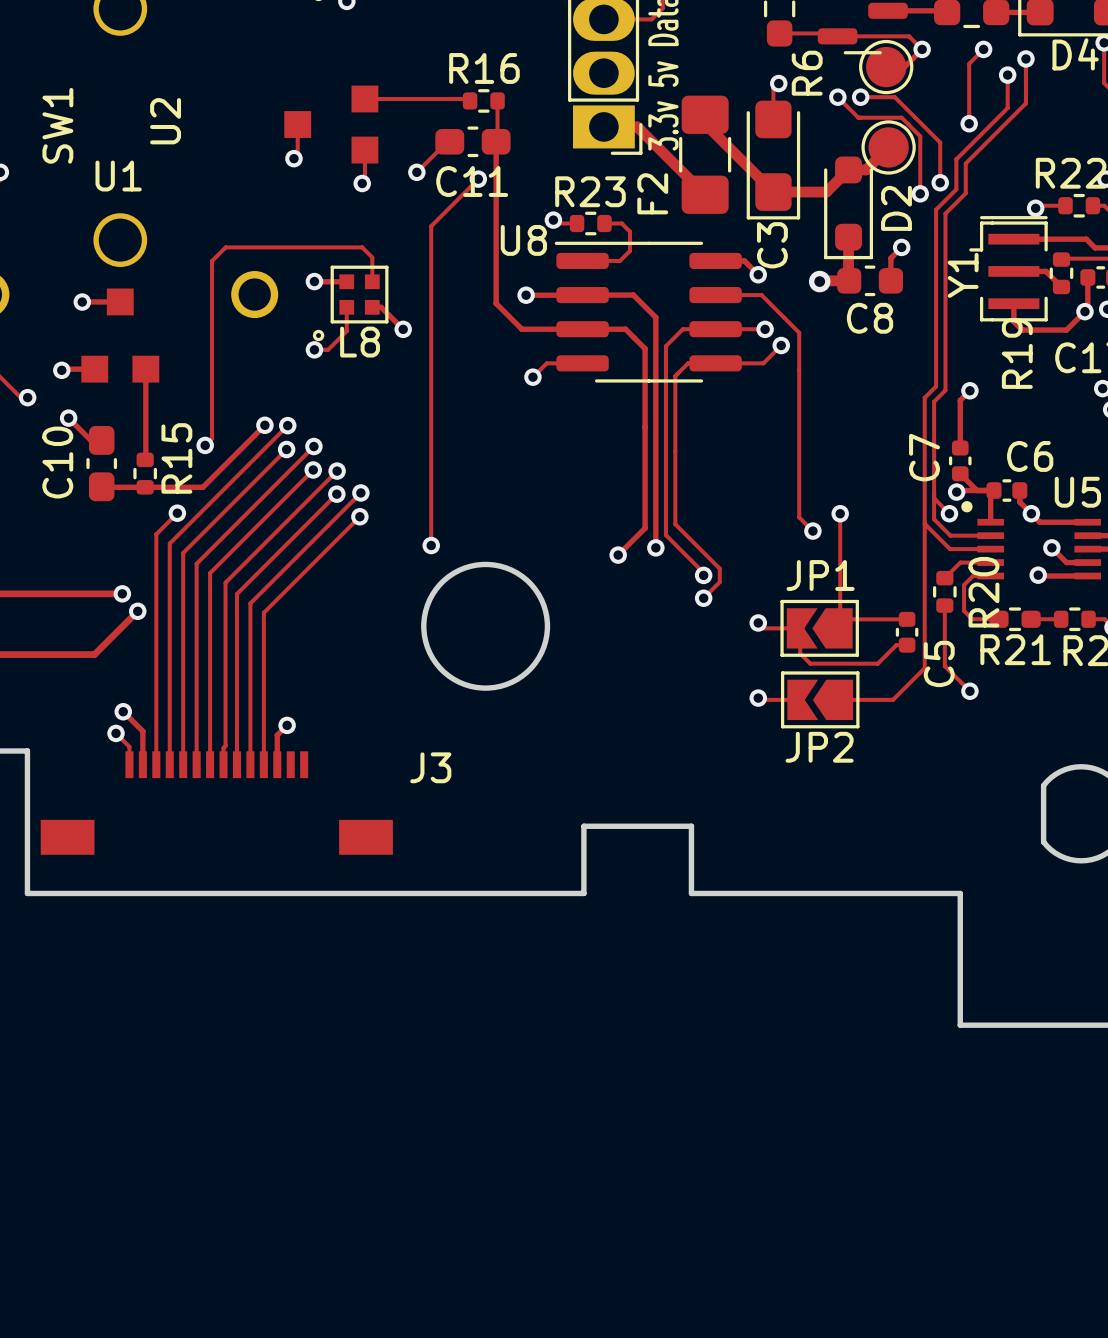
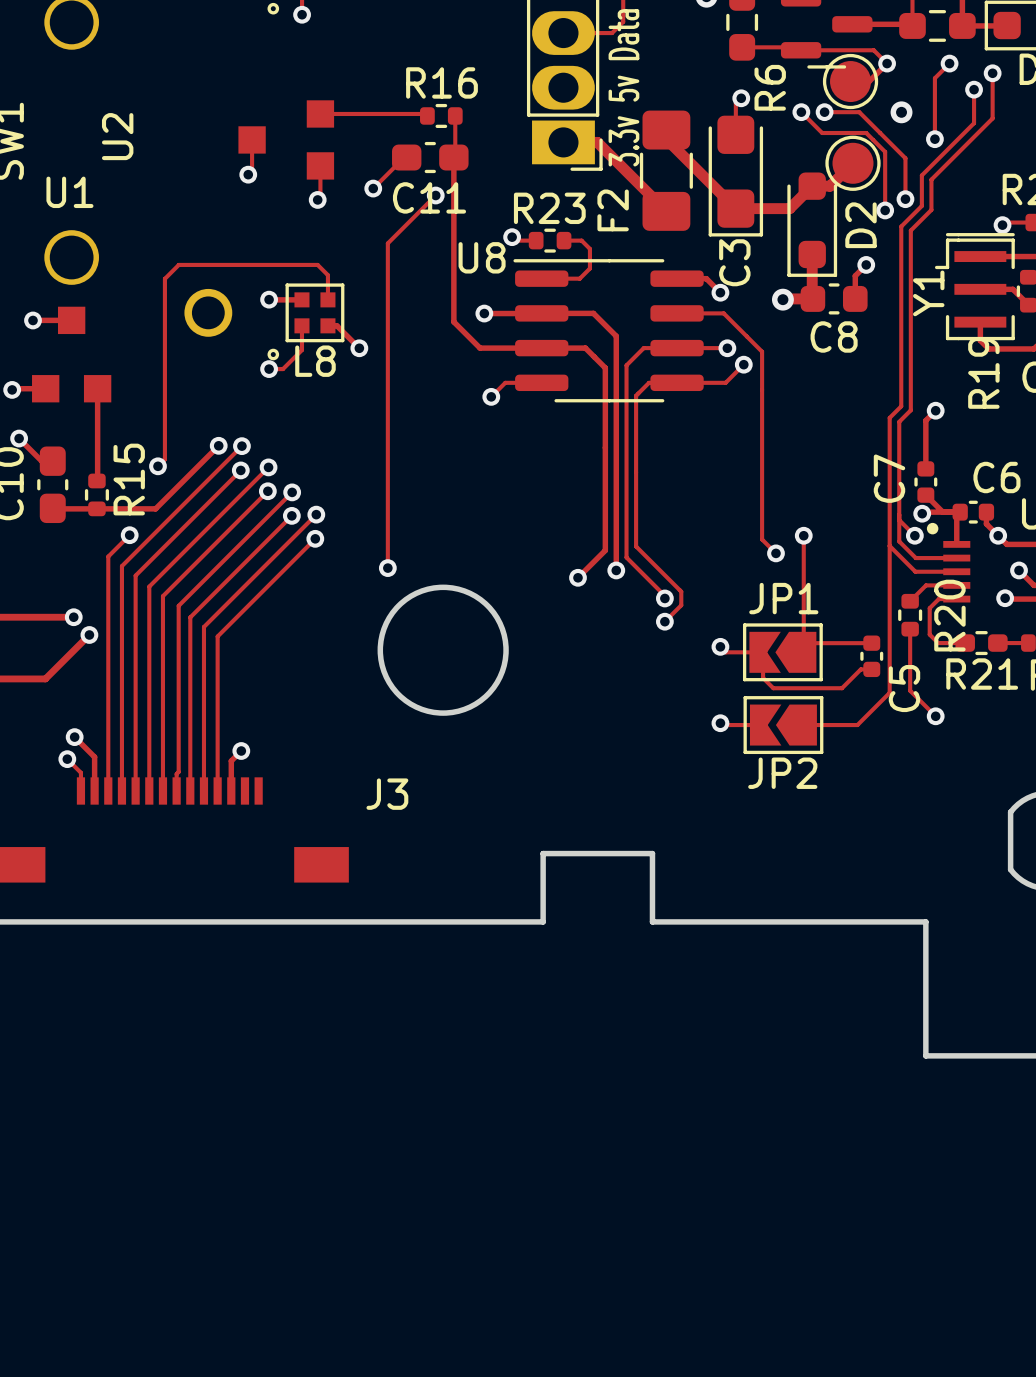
via: none -> (901, 112)

